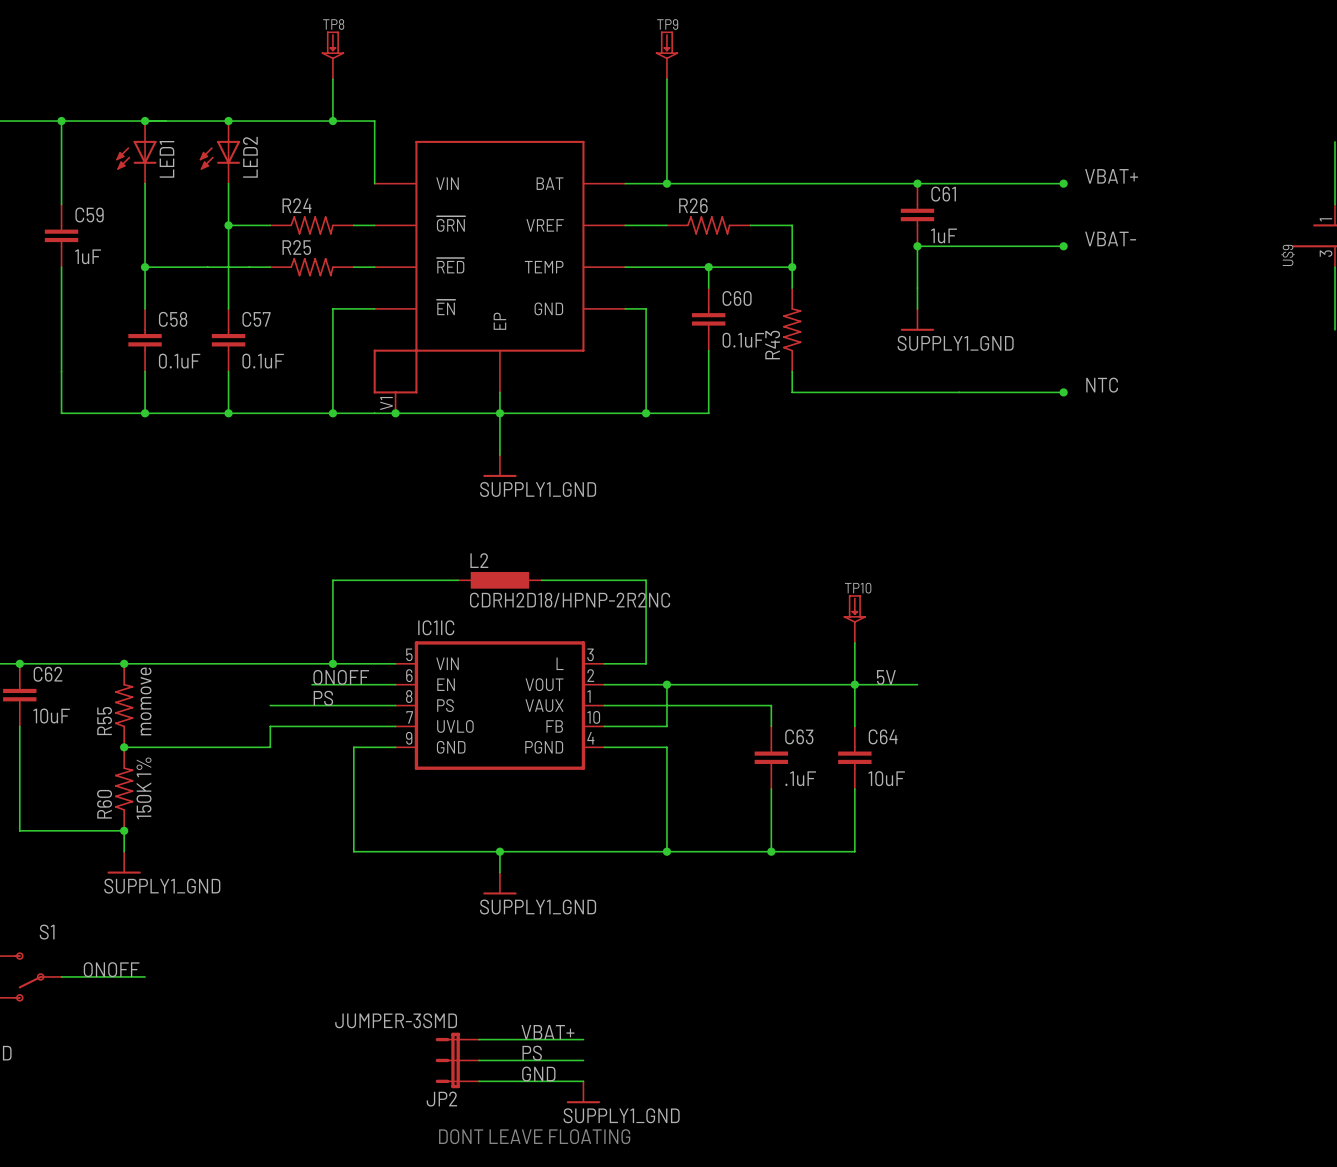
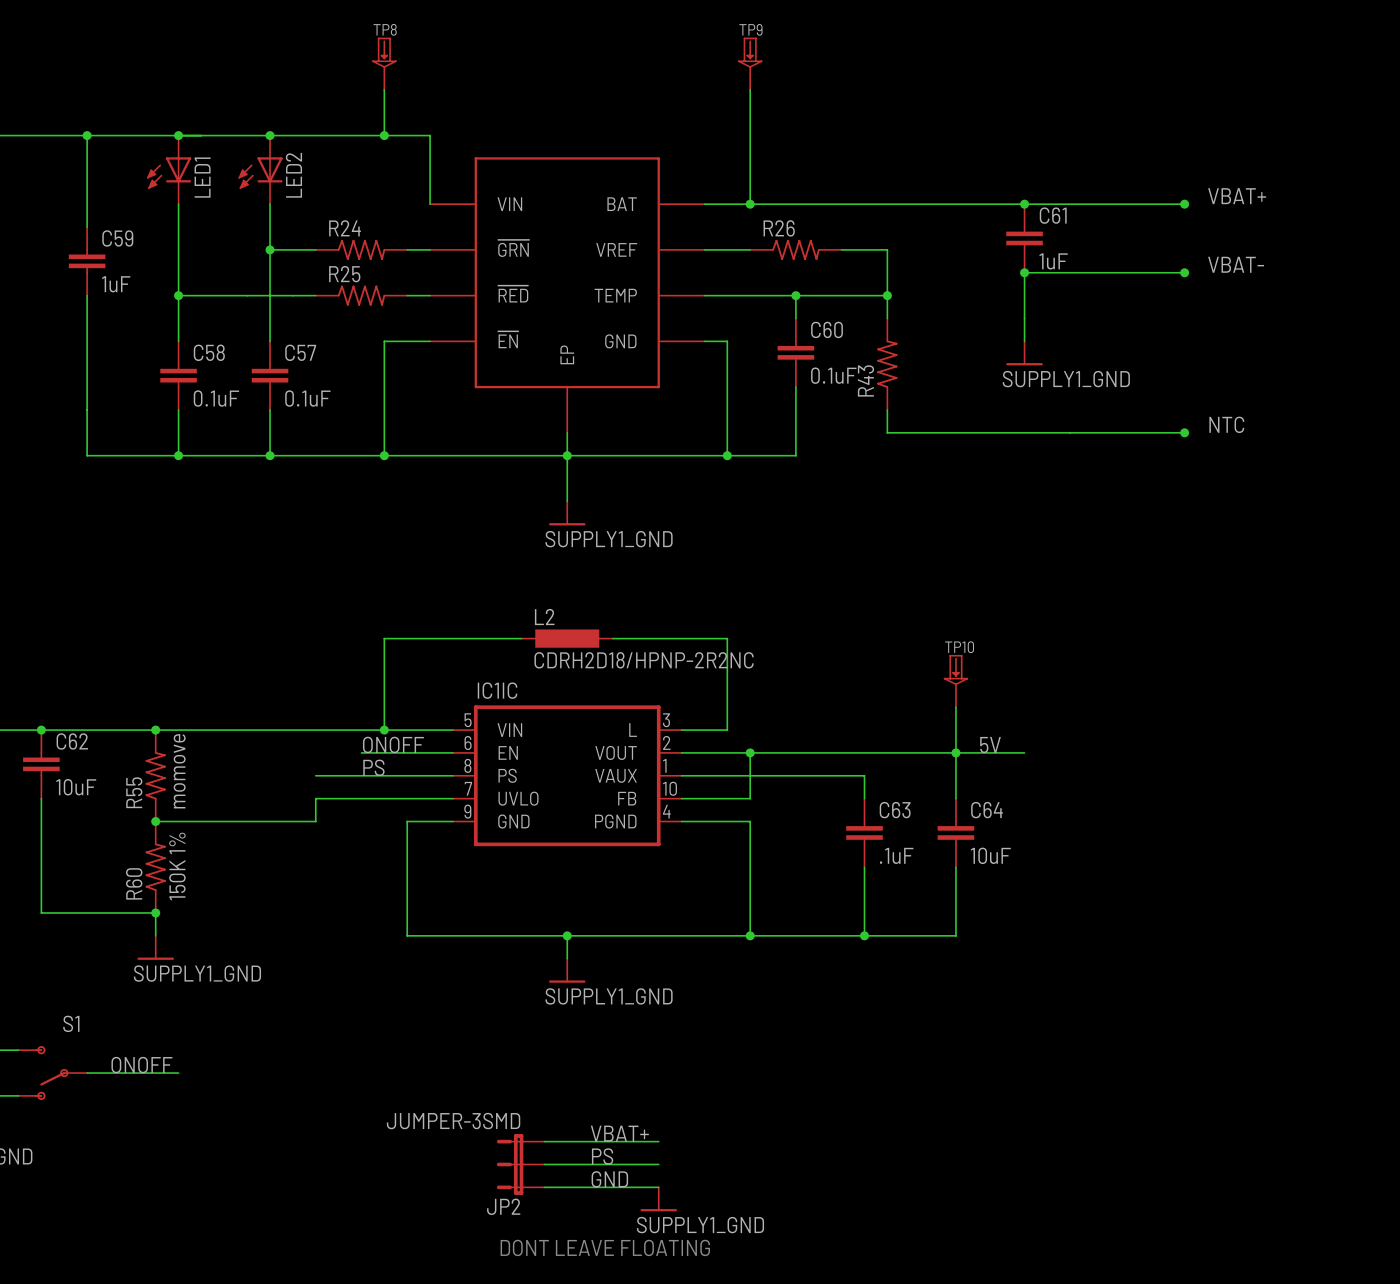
part: (395, 381) -> none
junction: (395, 413) -> none

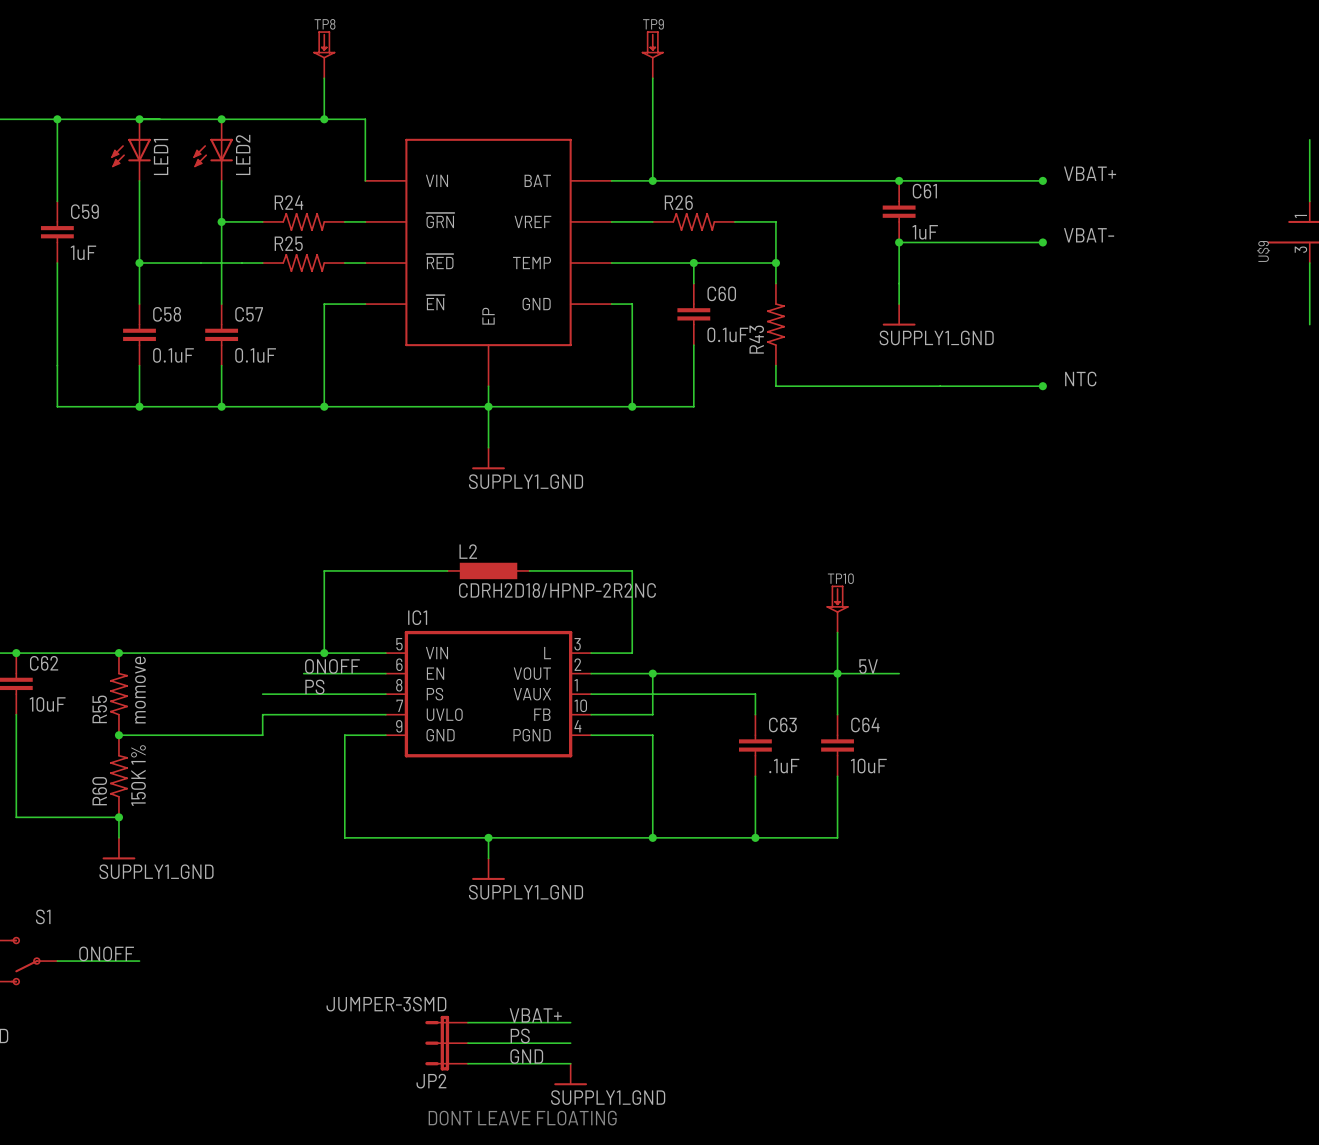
IC1IC name: IC1IC (497, 690) -> IC1 (417, 617)

